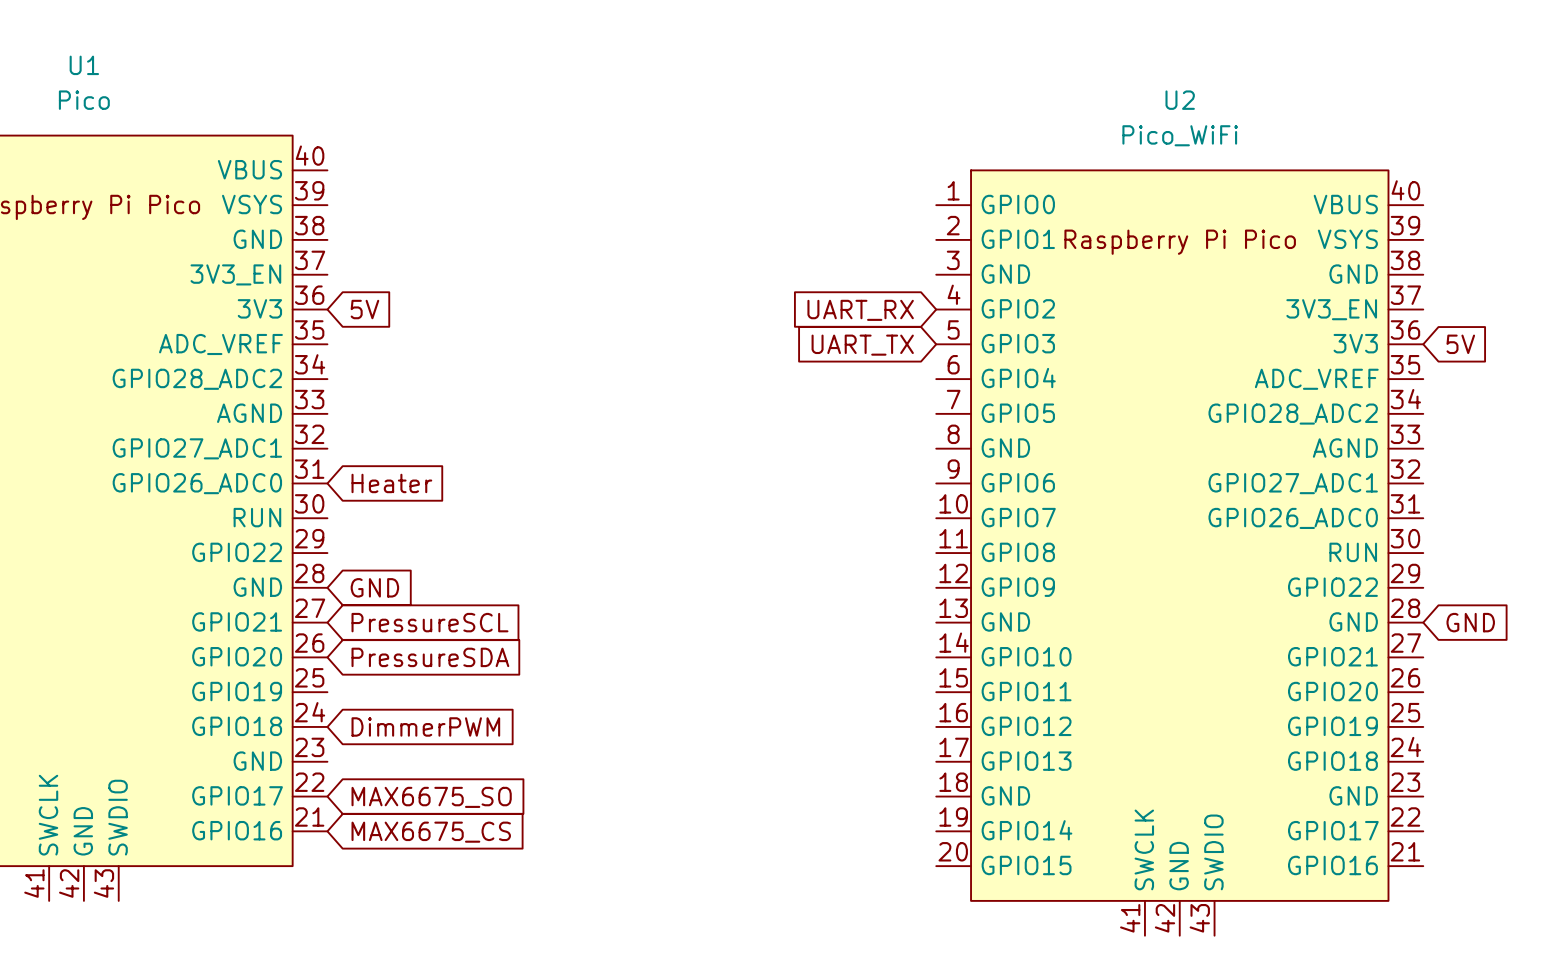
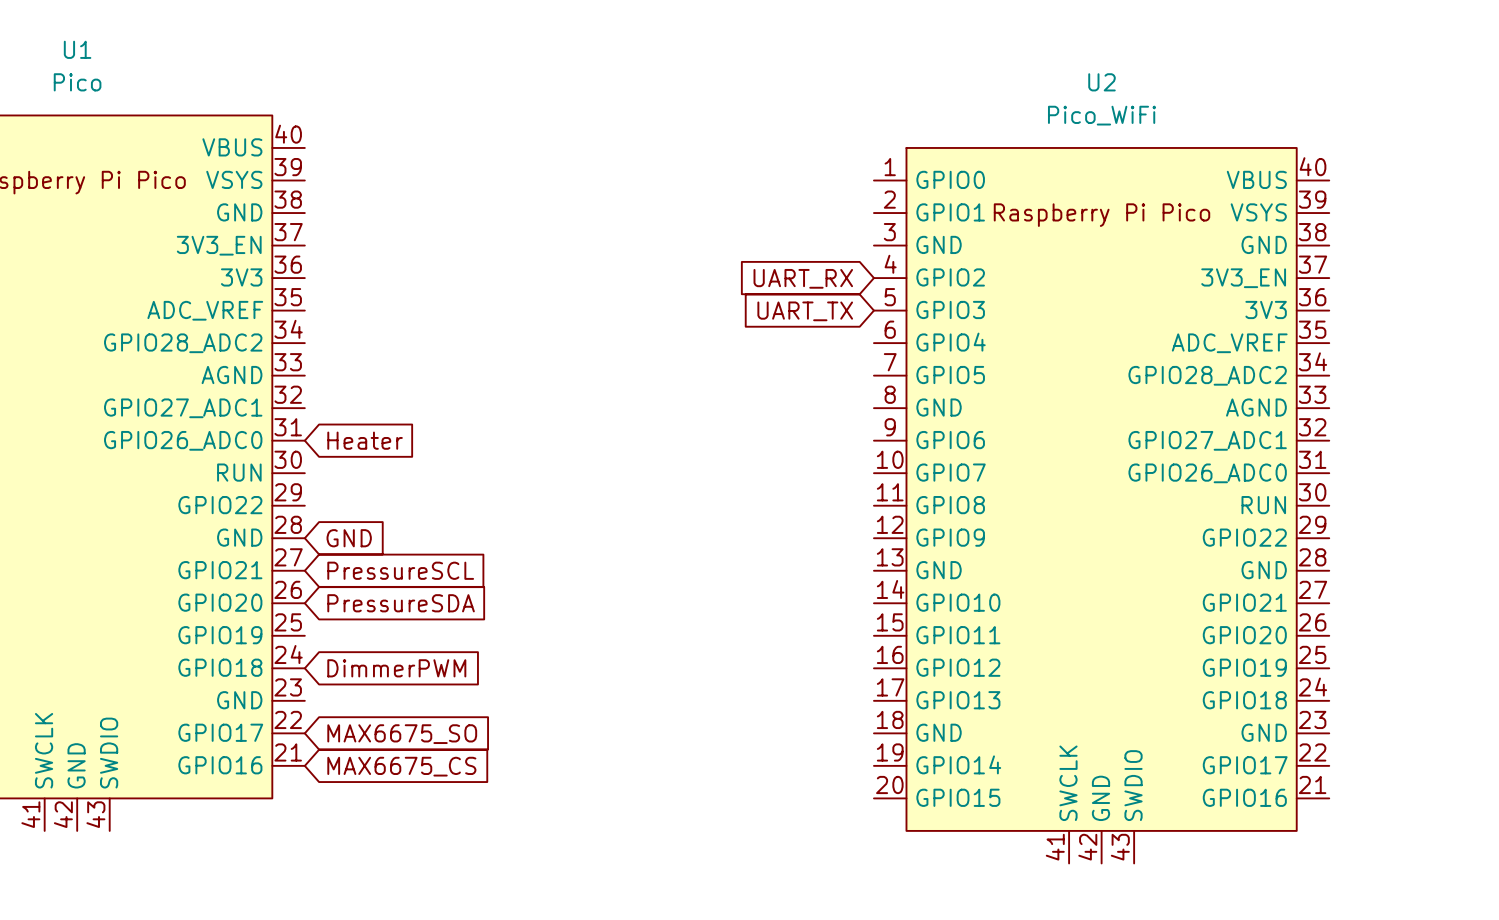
global label: 5V (364, 309) -> none
global label: 5V (1460, 344) -> none
global label: GND (1470, 622) -> none

